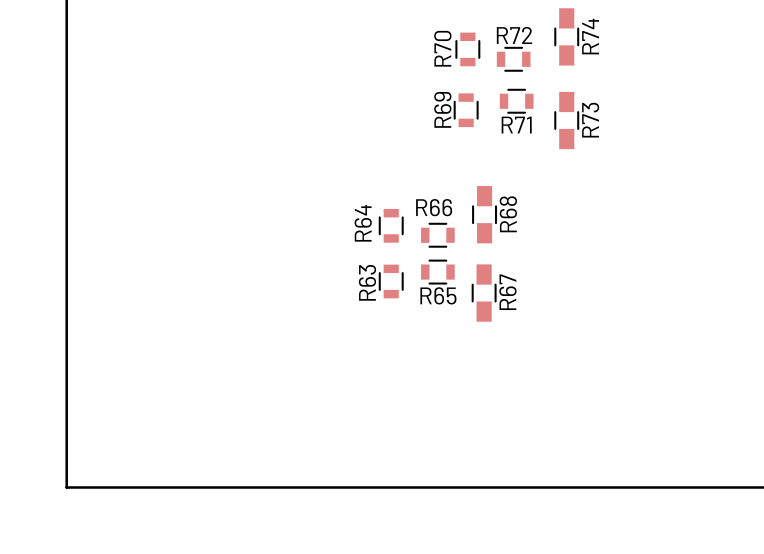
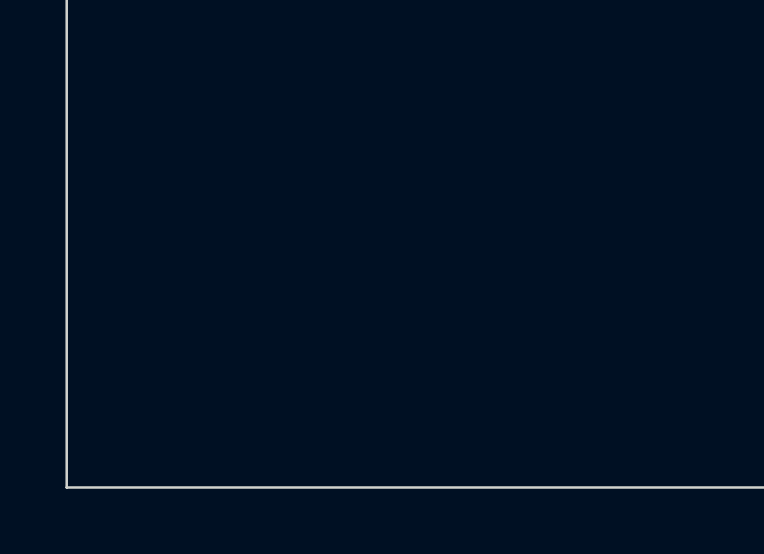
R74: (566, 36) -> none
R70: (467, 49) -> none
R72: (513, 59) -> none
R71: (516, 101) -> none
R69: (466, 110) -> none
R73: (566, 120) -> none
R68: (484, 214) -> none
R64: (391, 225) -> none
R66: (437, 235) -> none
R65: (437, 272) -> none
R63: (391, 281) -> none
R67: (484, 293) -> none

